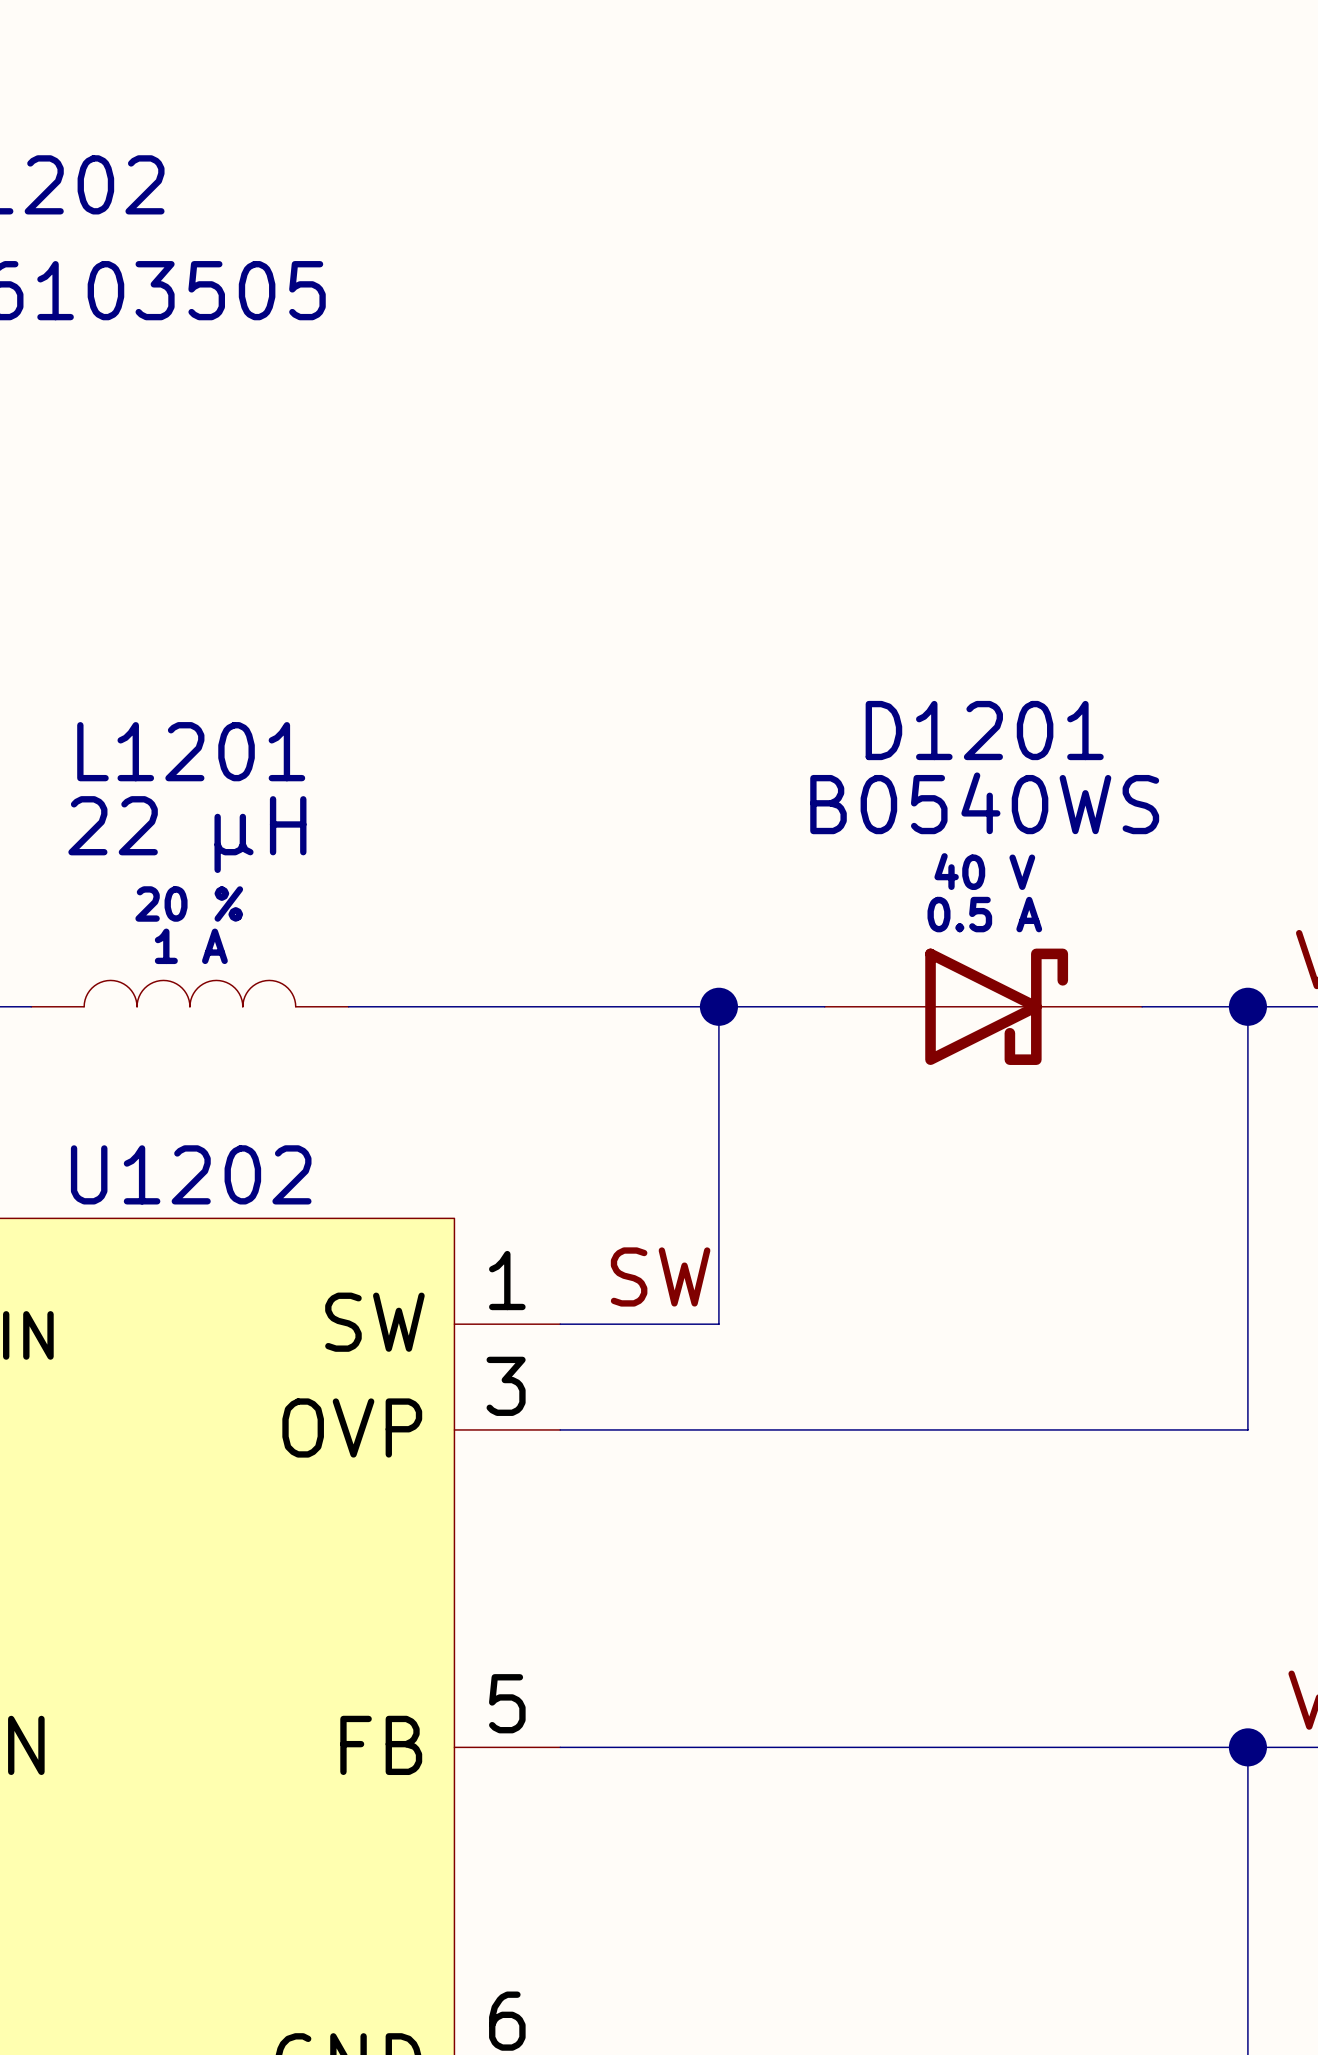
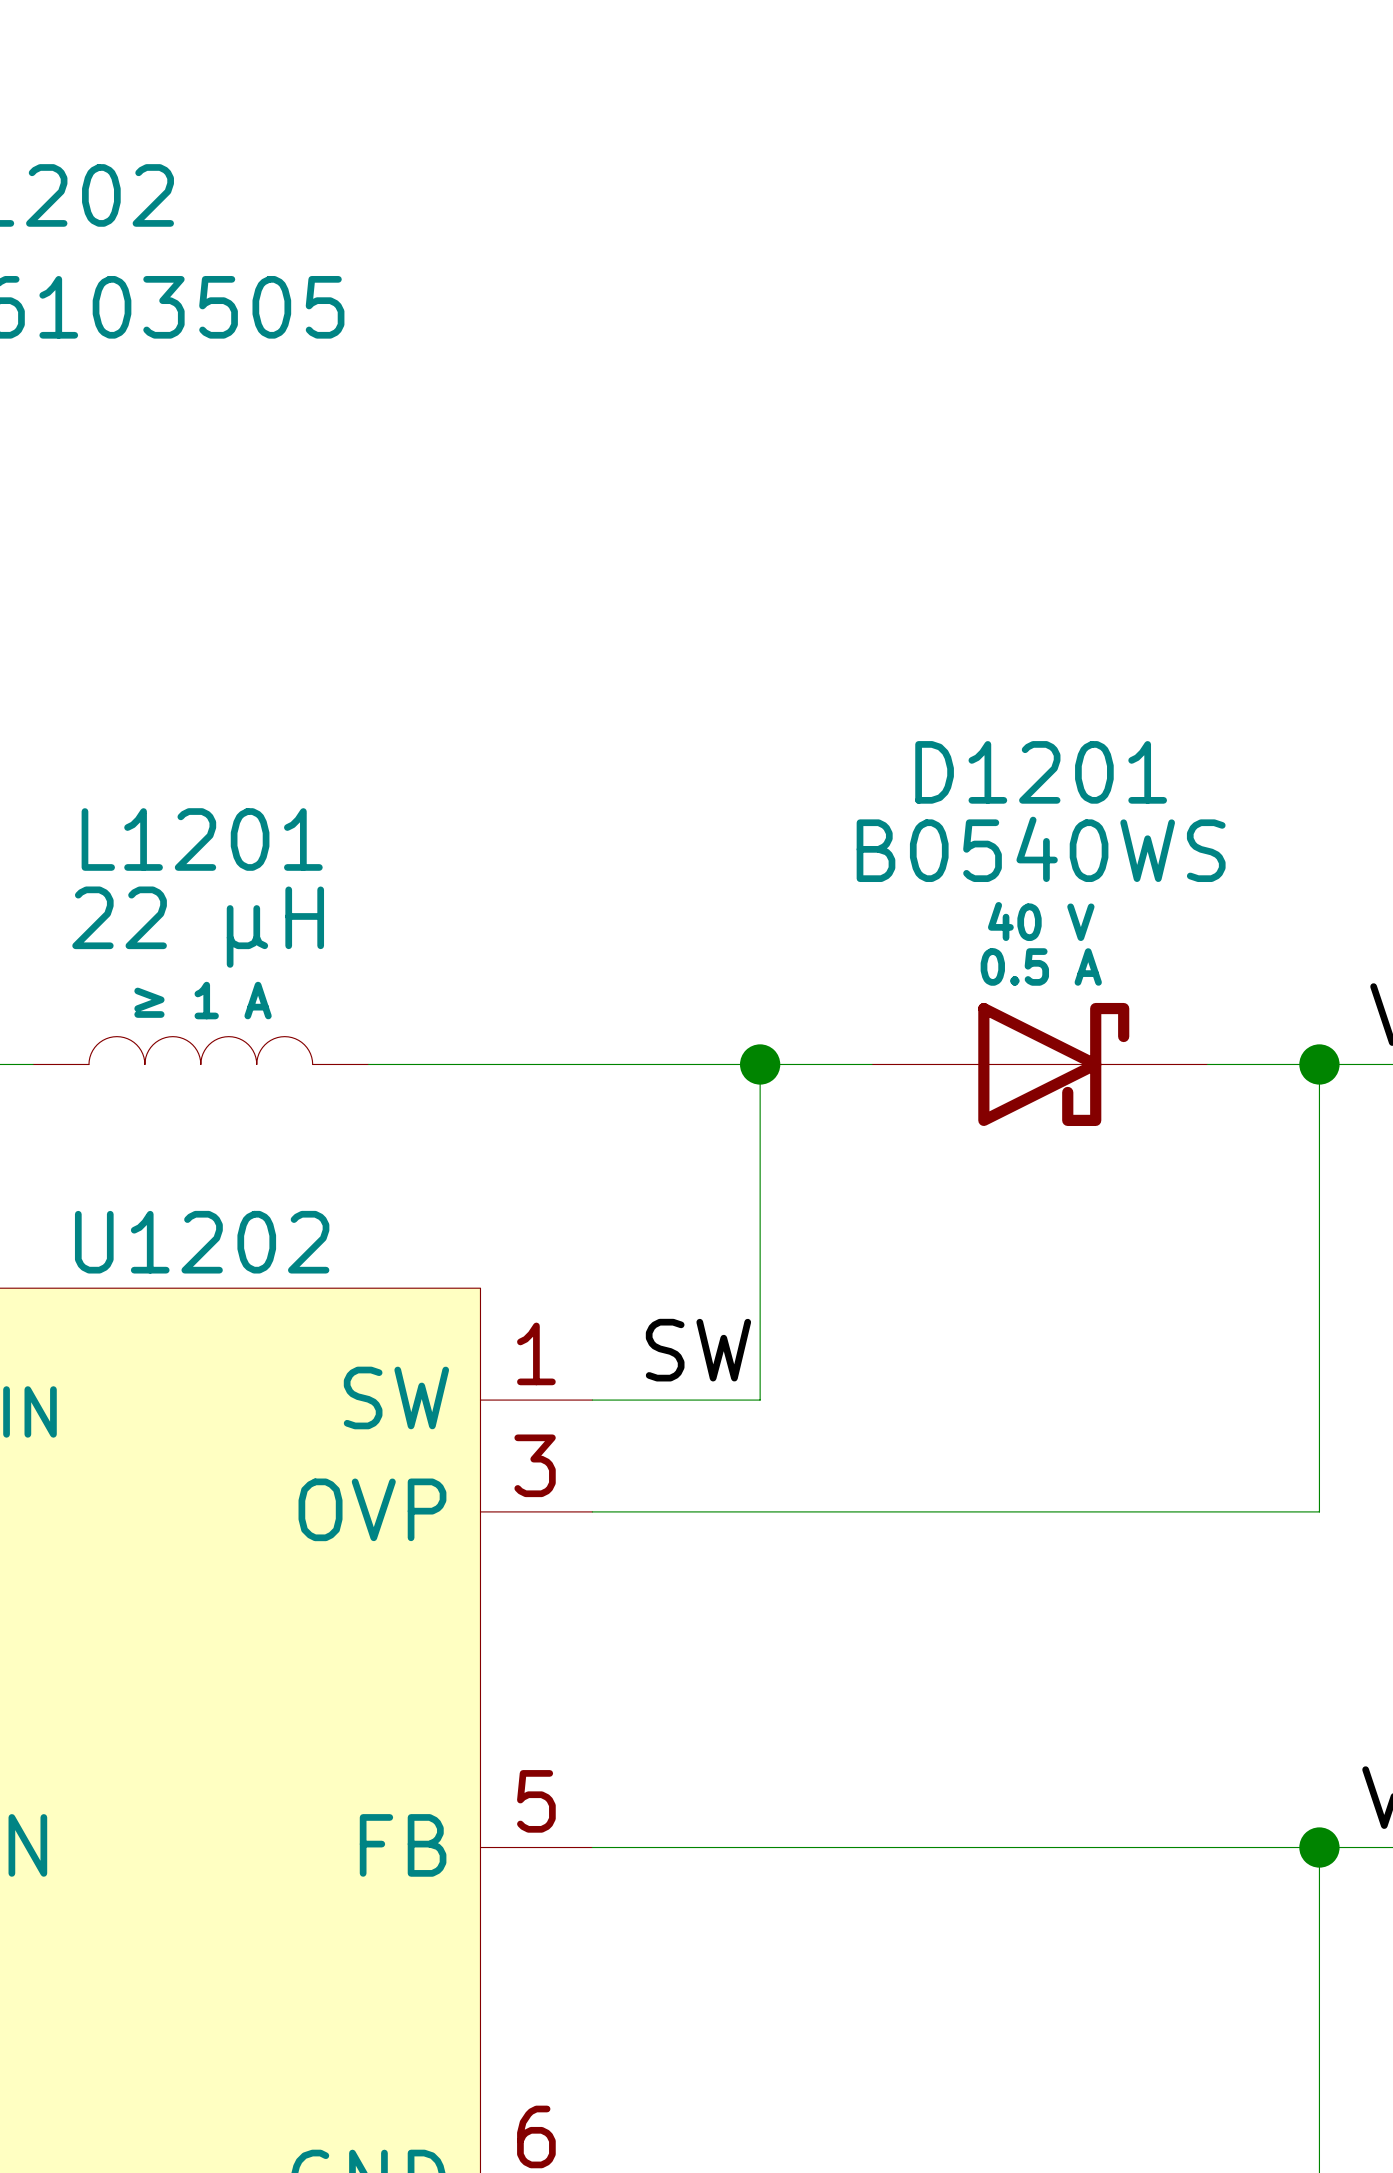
L1201 name position: L1201 (191, 751) -> L1201 (202, 839)
L1201 value position: 22 µH (187, 834) -> 22 µH (198, 927)
L1201 text: 20 % (189, 903) -> none
L1201 text: 1 A (191, 946) -> ≥ 1 A (203, 1000)

